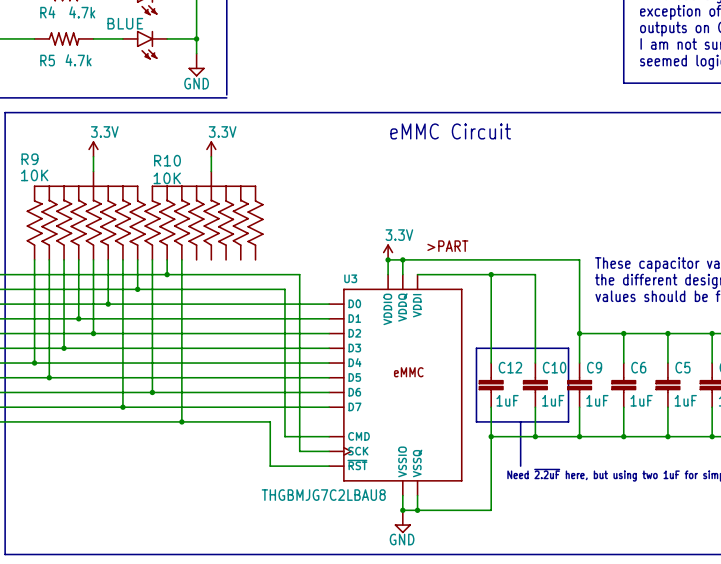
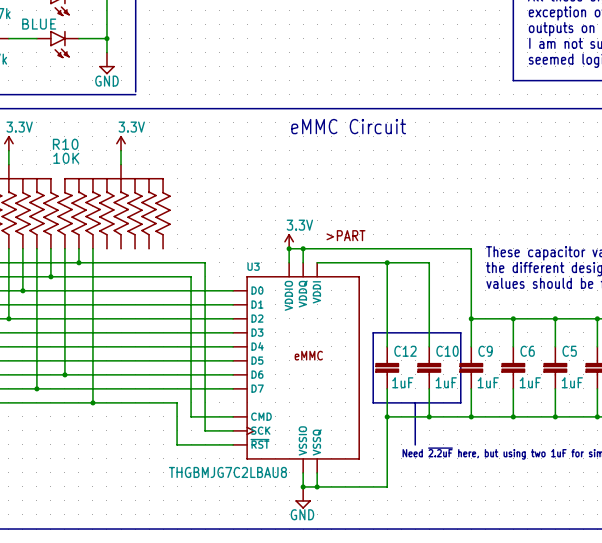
R10 name position: R10 (167, 160) -> R10 (65, 144)
R10 value position: 10K (167, 178) -> 10K (66, 158)

